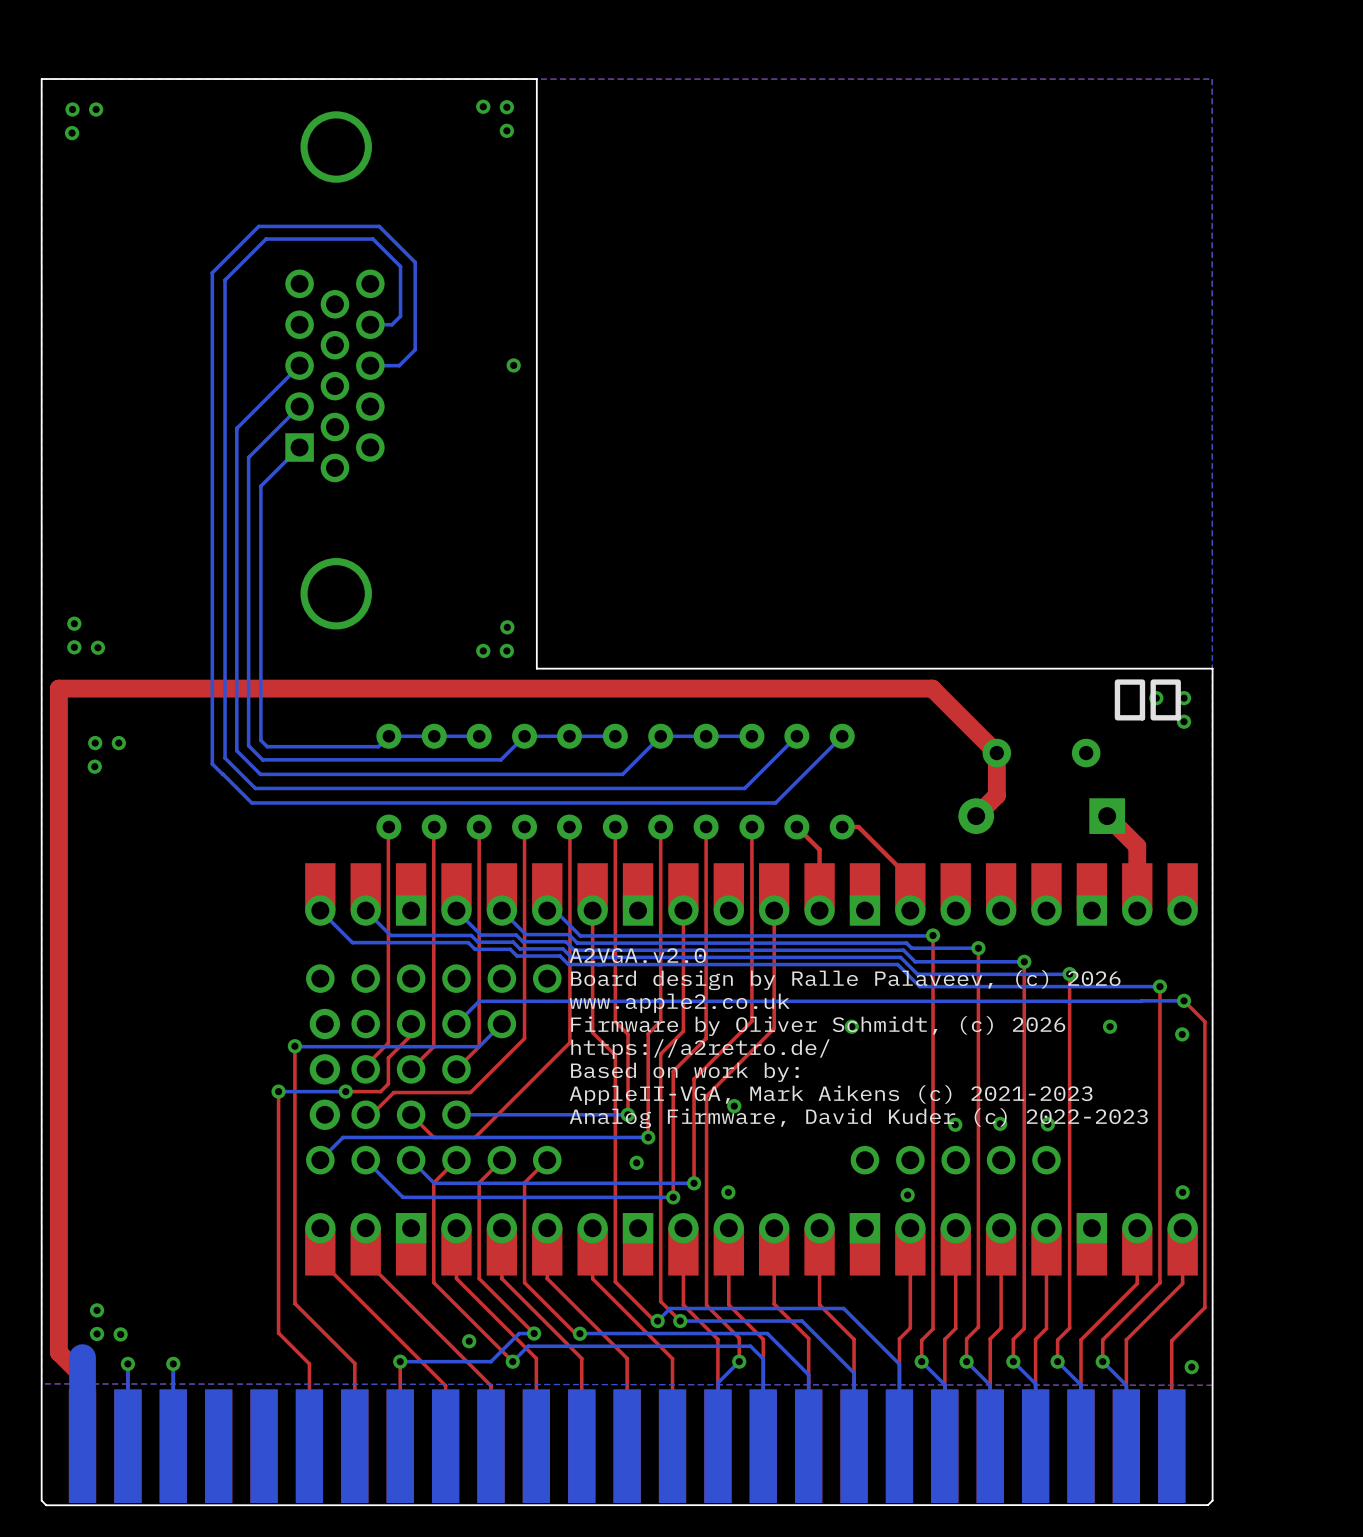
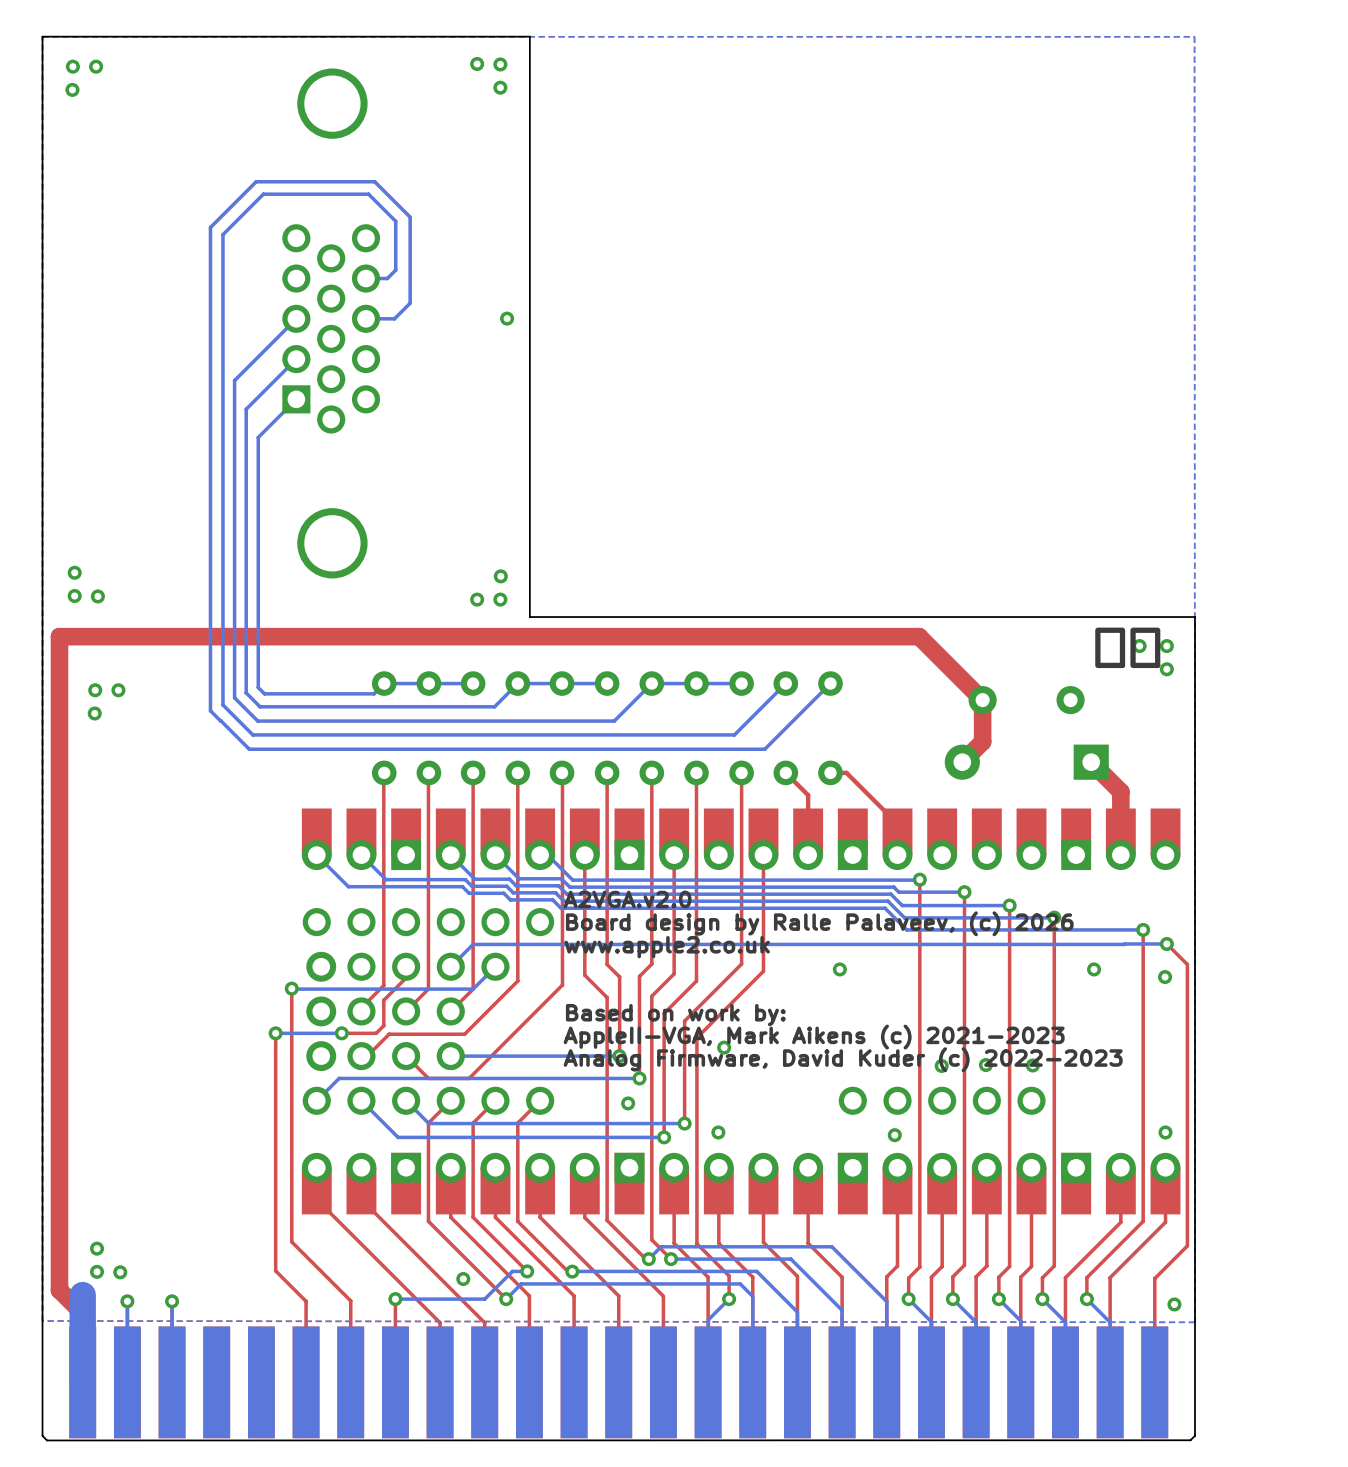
text: Firmware by Oliver Schmidt, (c) 2026 (818, 1026) -> none
text: https://a2retro.de/ (700, 1049) -> none

